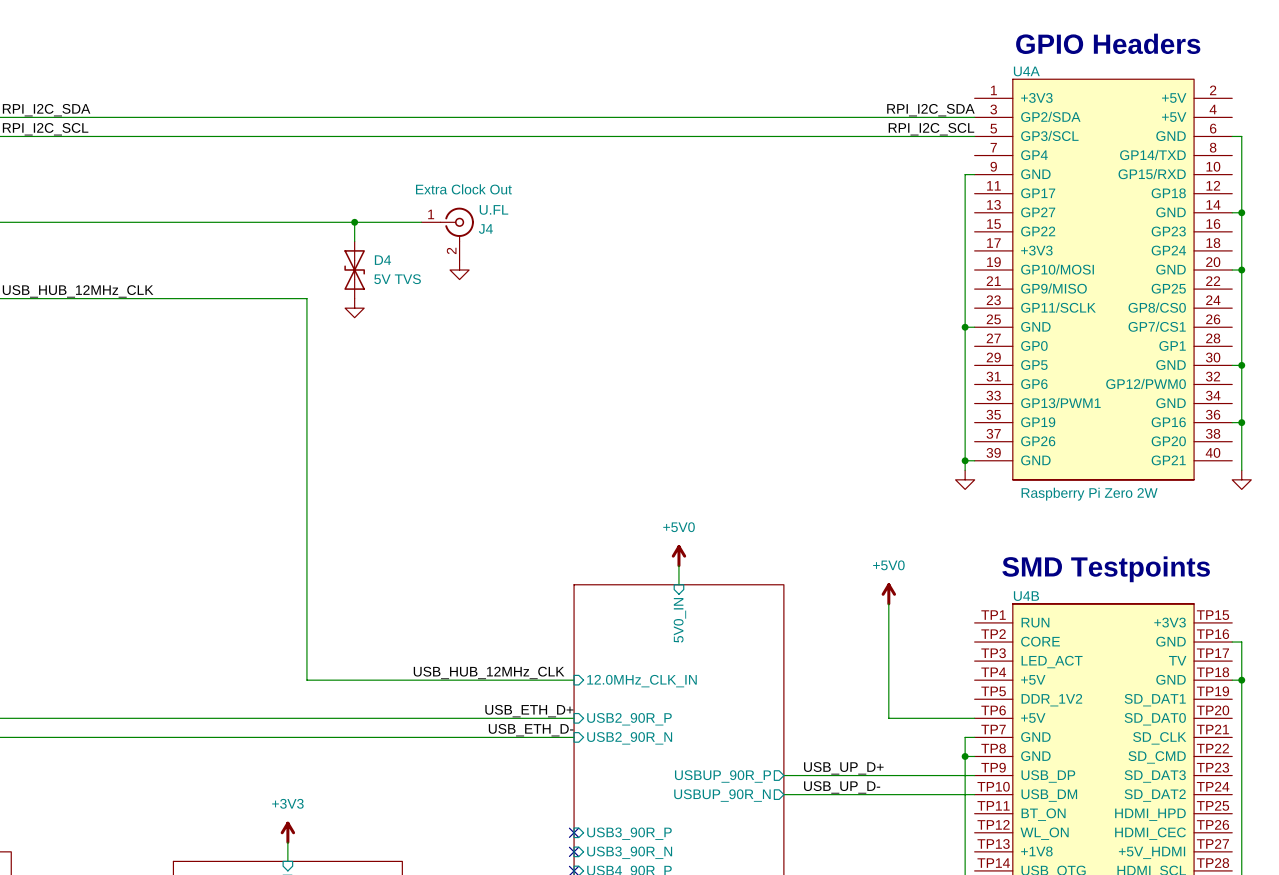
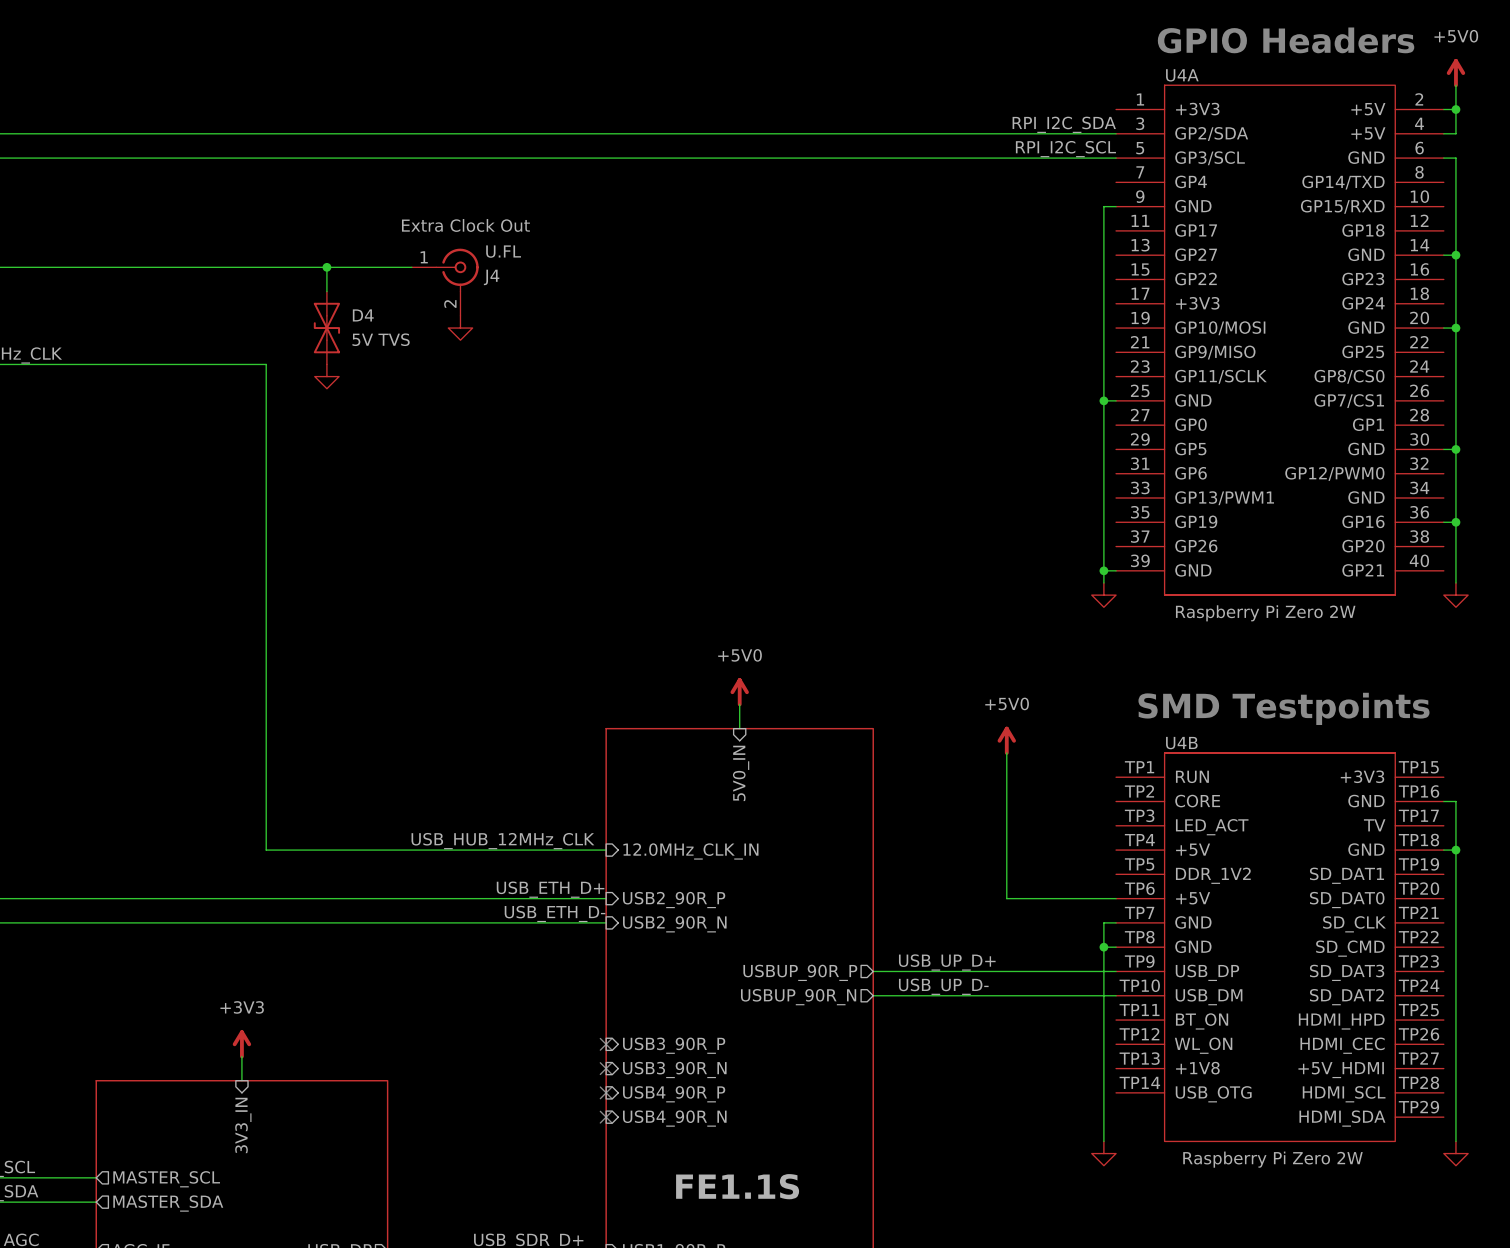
power symbol: none -> +5V0 (1455, 73)
wire: none -> (1455, 85) (1455, 133) (1443, 133)
wire: none -> (1443, 109) (1455, 109)
junction: none -> (1455, 109)

